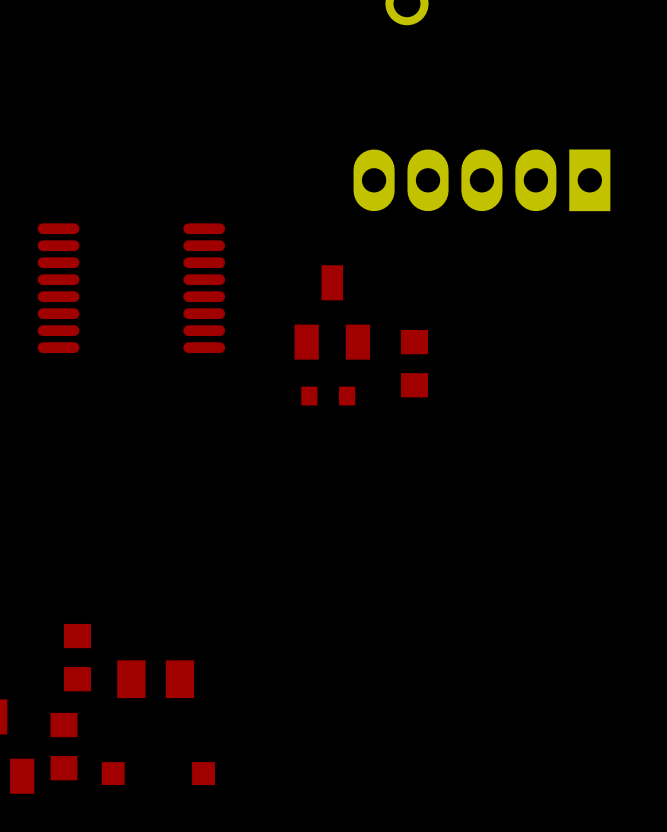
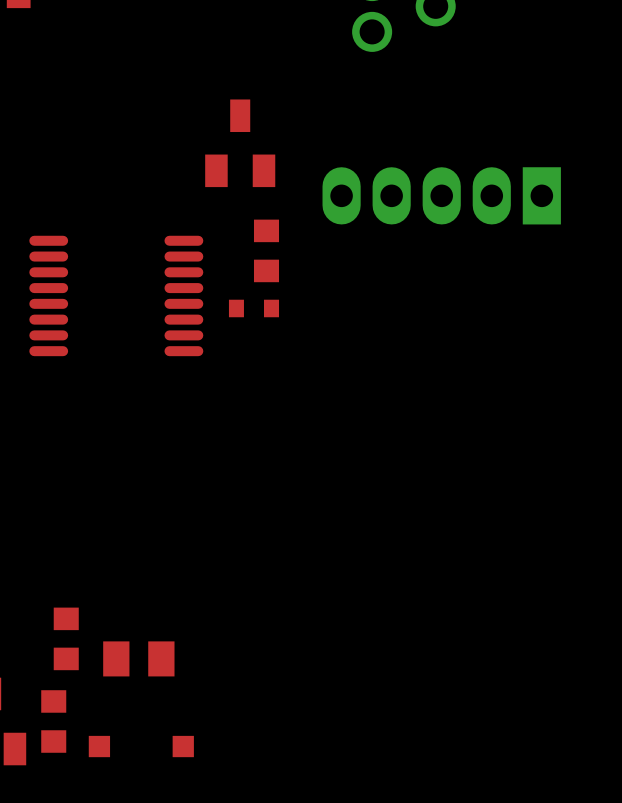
part position: (332, 312) -> (240, 143)
part position: (414, 363) -> (266, 250)
part position: (328, 396) -> (253, 308)

